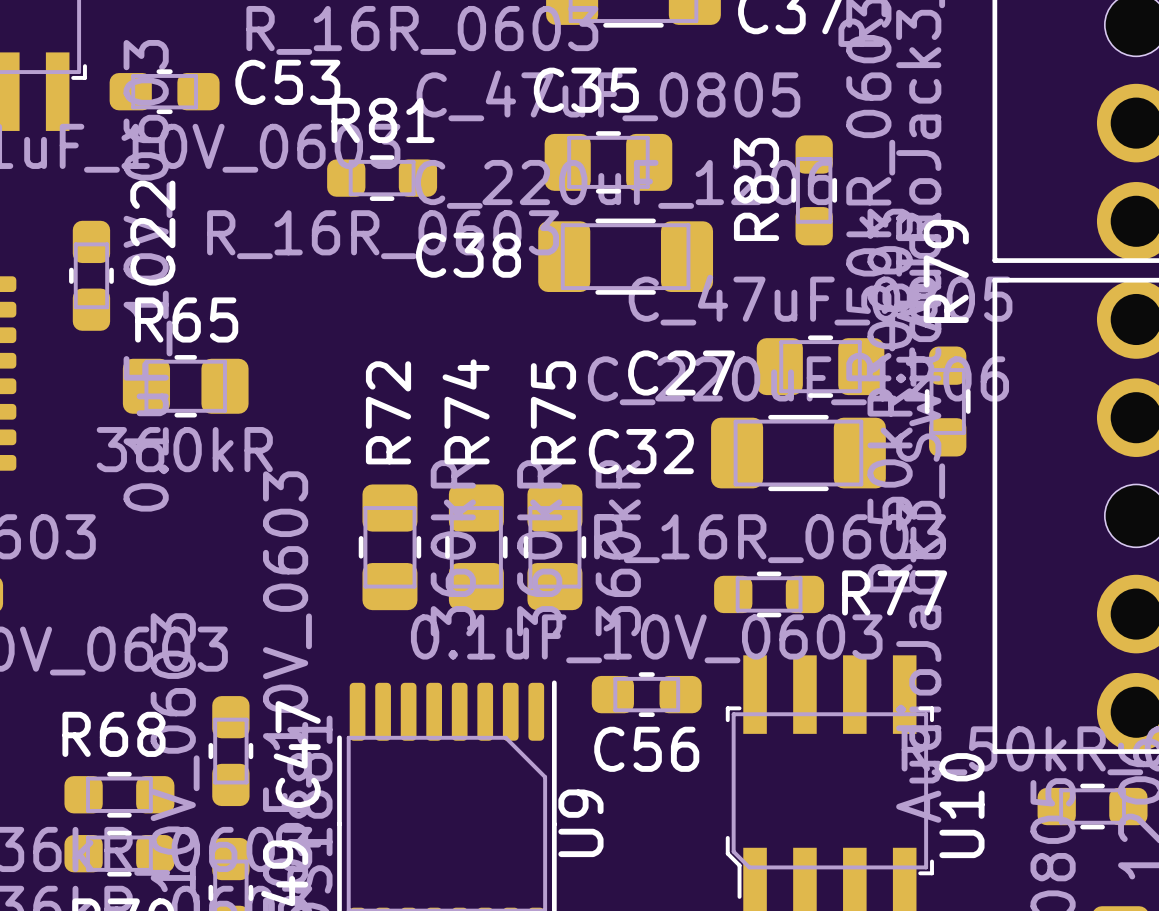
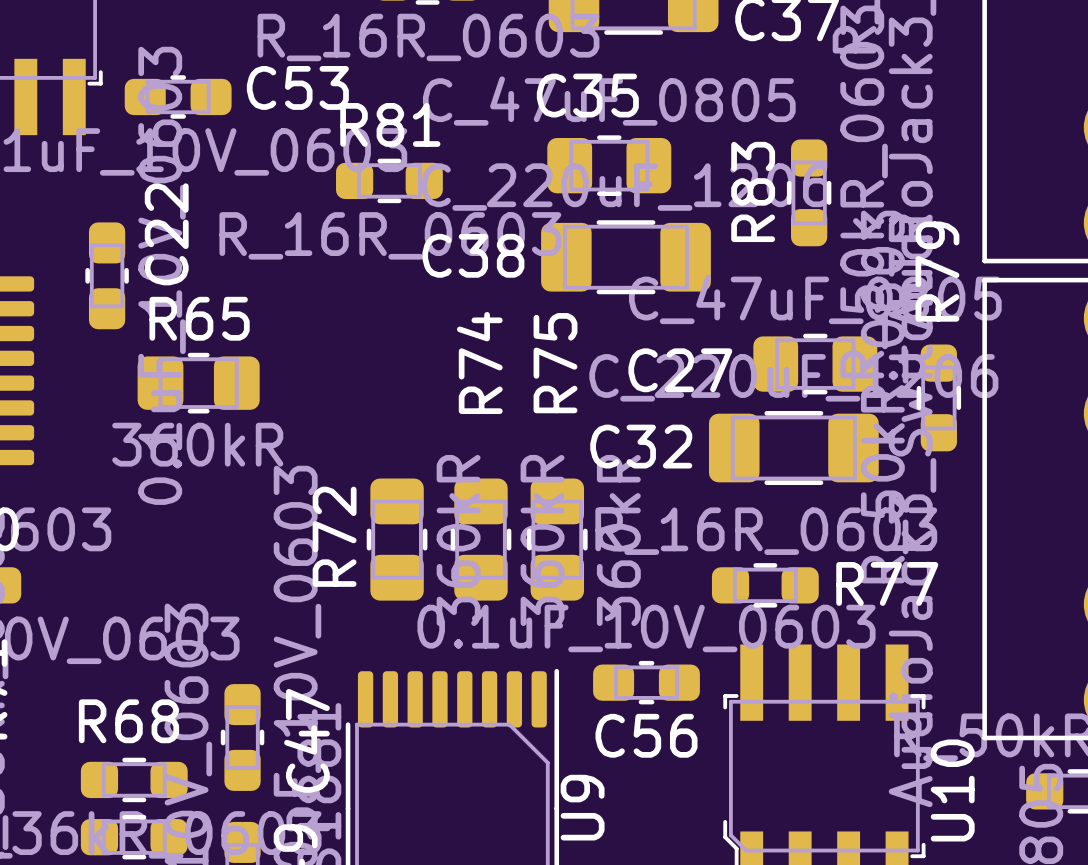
R74 name position: R74 (466, 411) -> R74 (479, 363)
R72 name position: R72 (388, 412) -> R72 (334, 536)
R75 name position: R75 (553, 412) -> R75 (555, 363)

